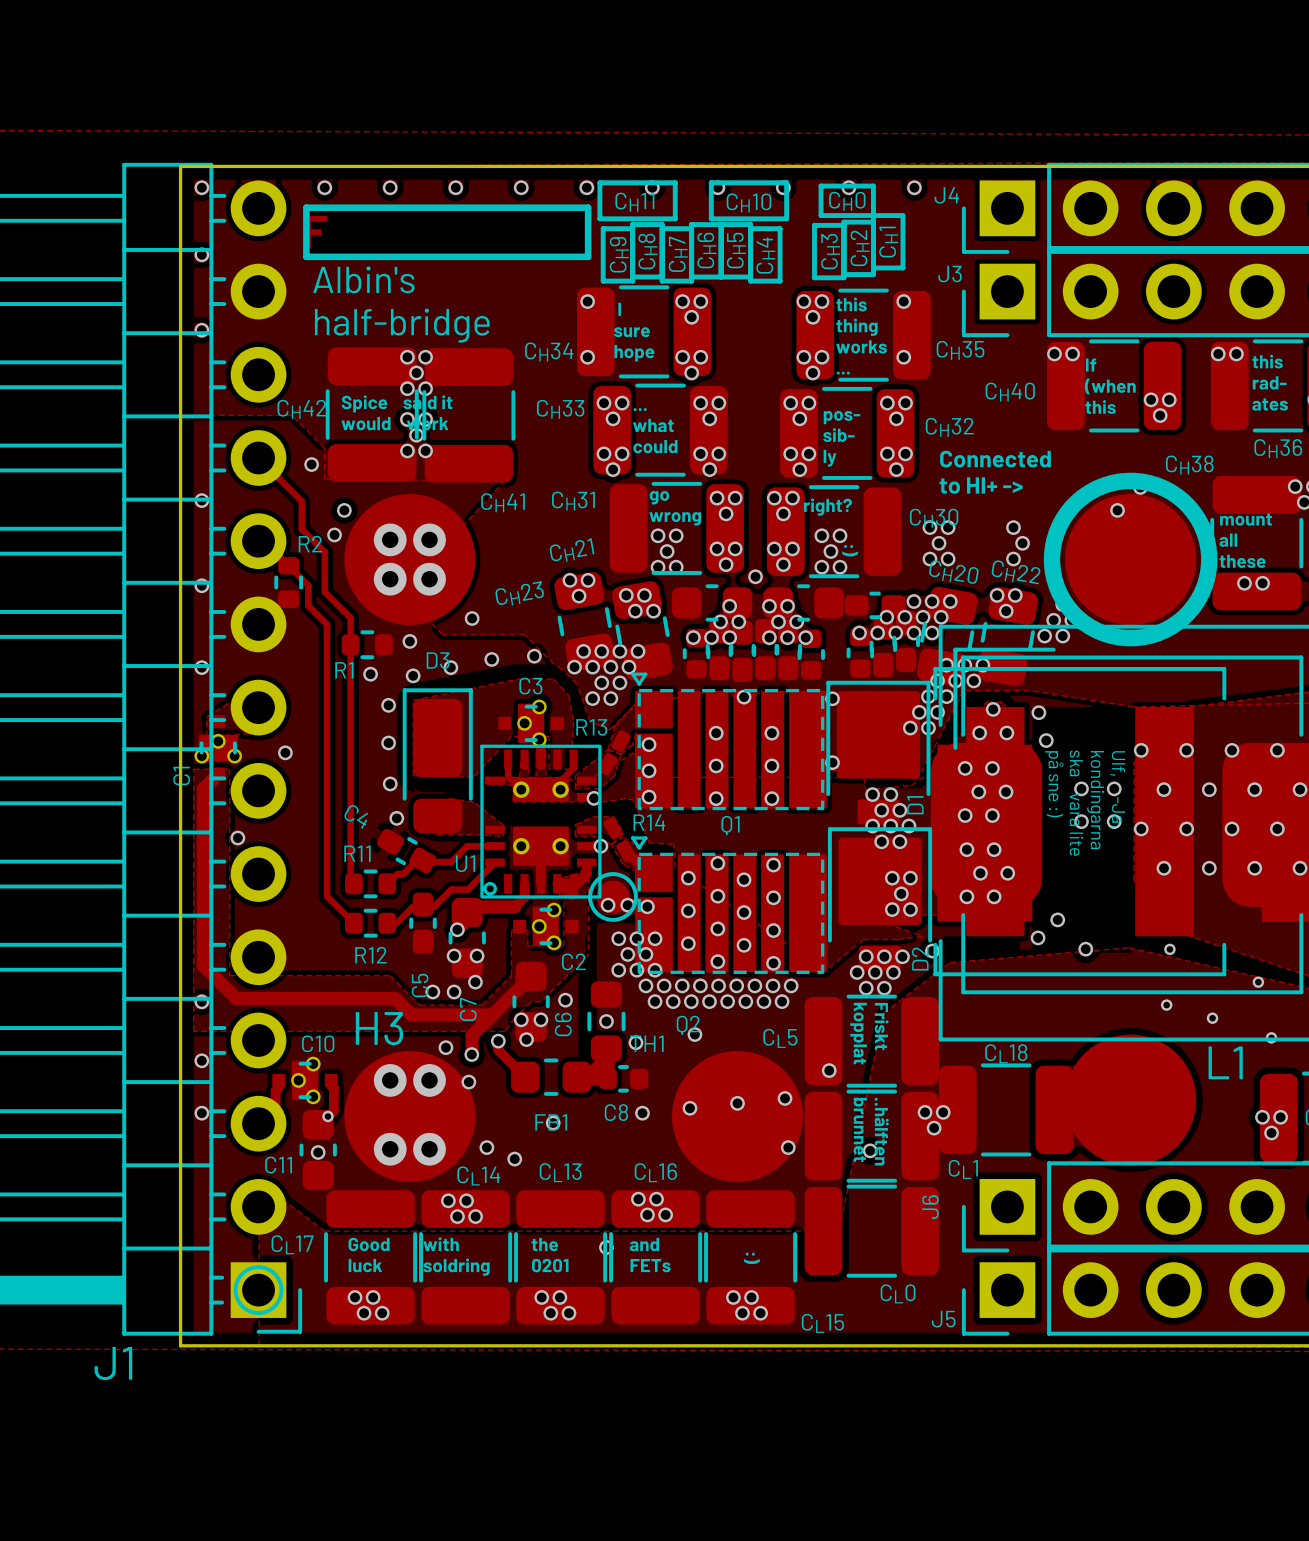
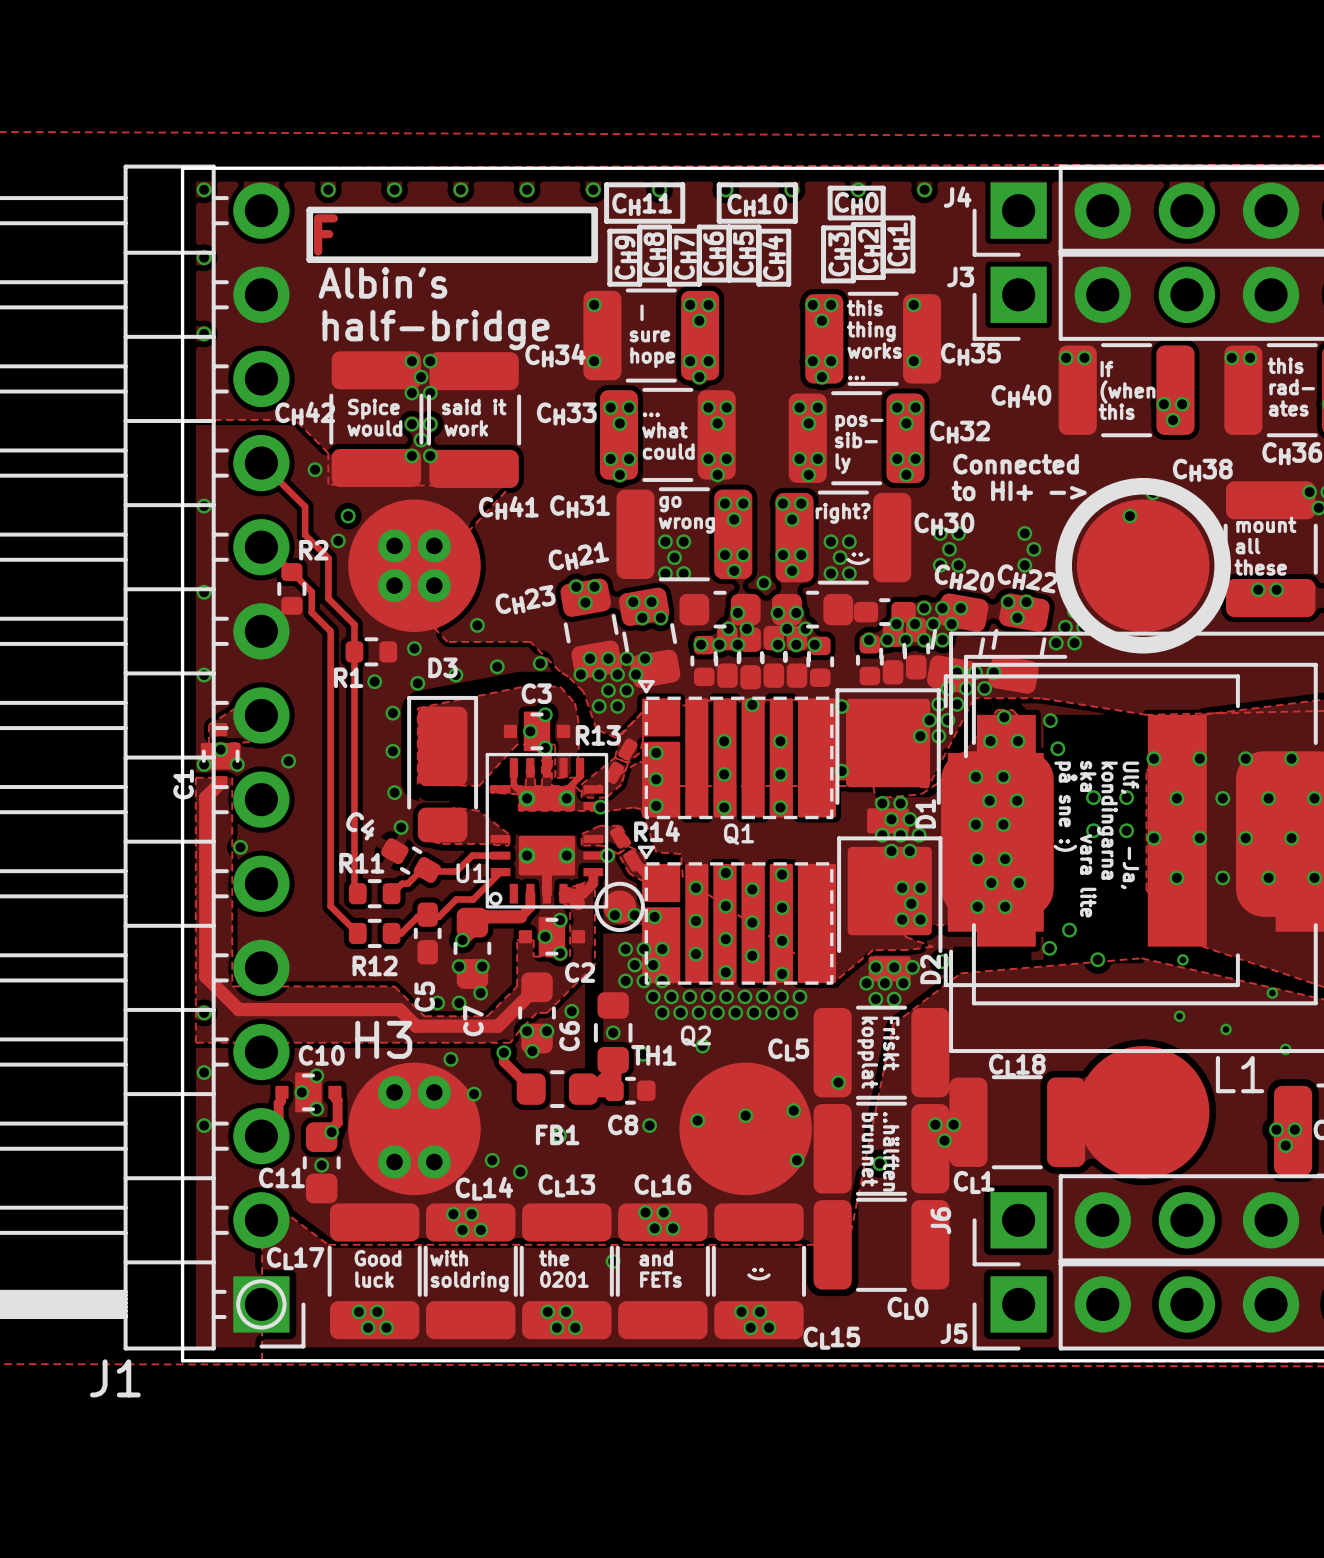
track: (492, 1014) (472, 1035) (472, 1054) -> none
via position: (471, 1054) -> (331, 1132)
via: (327, 1116) -> none

